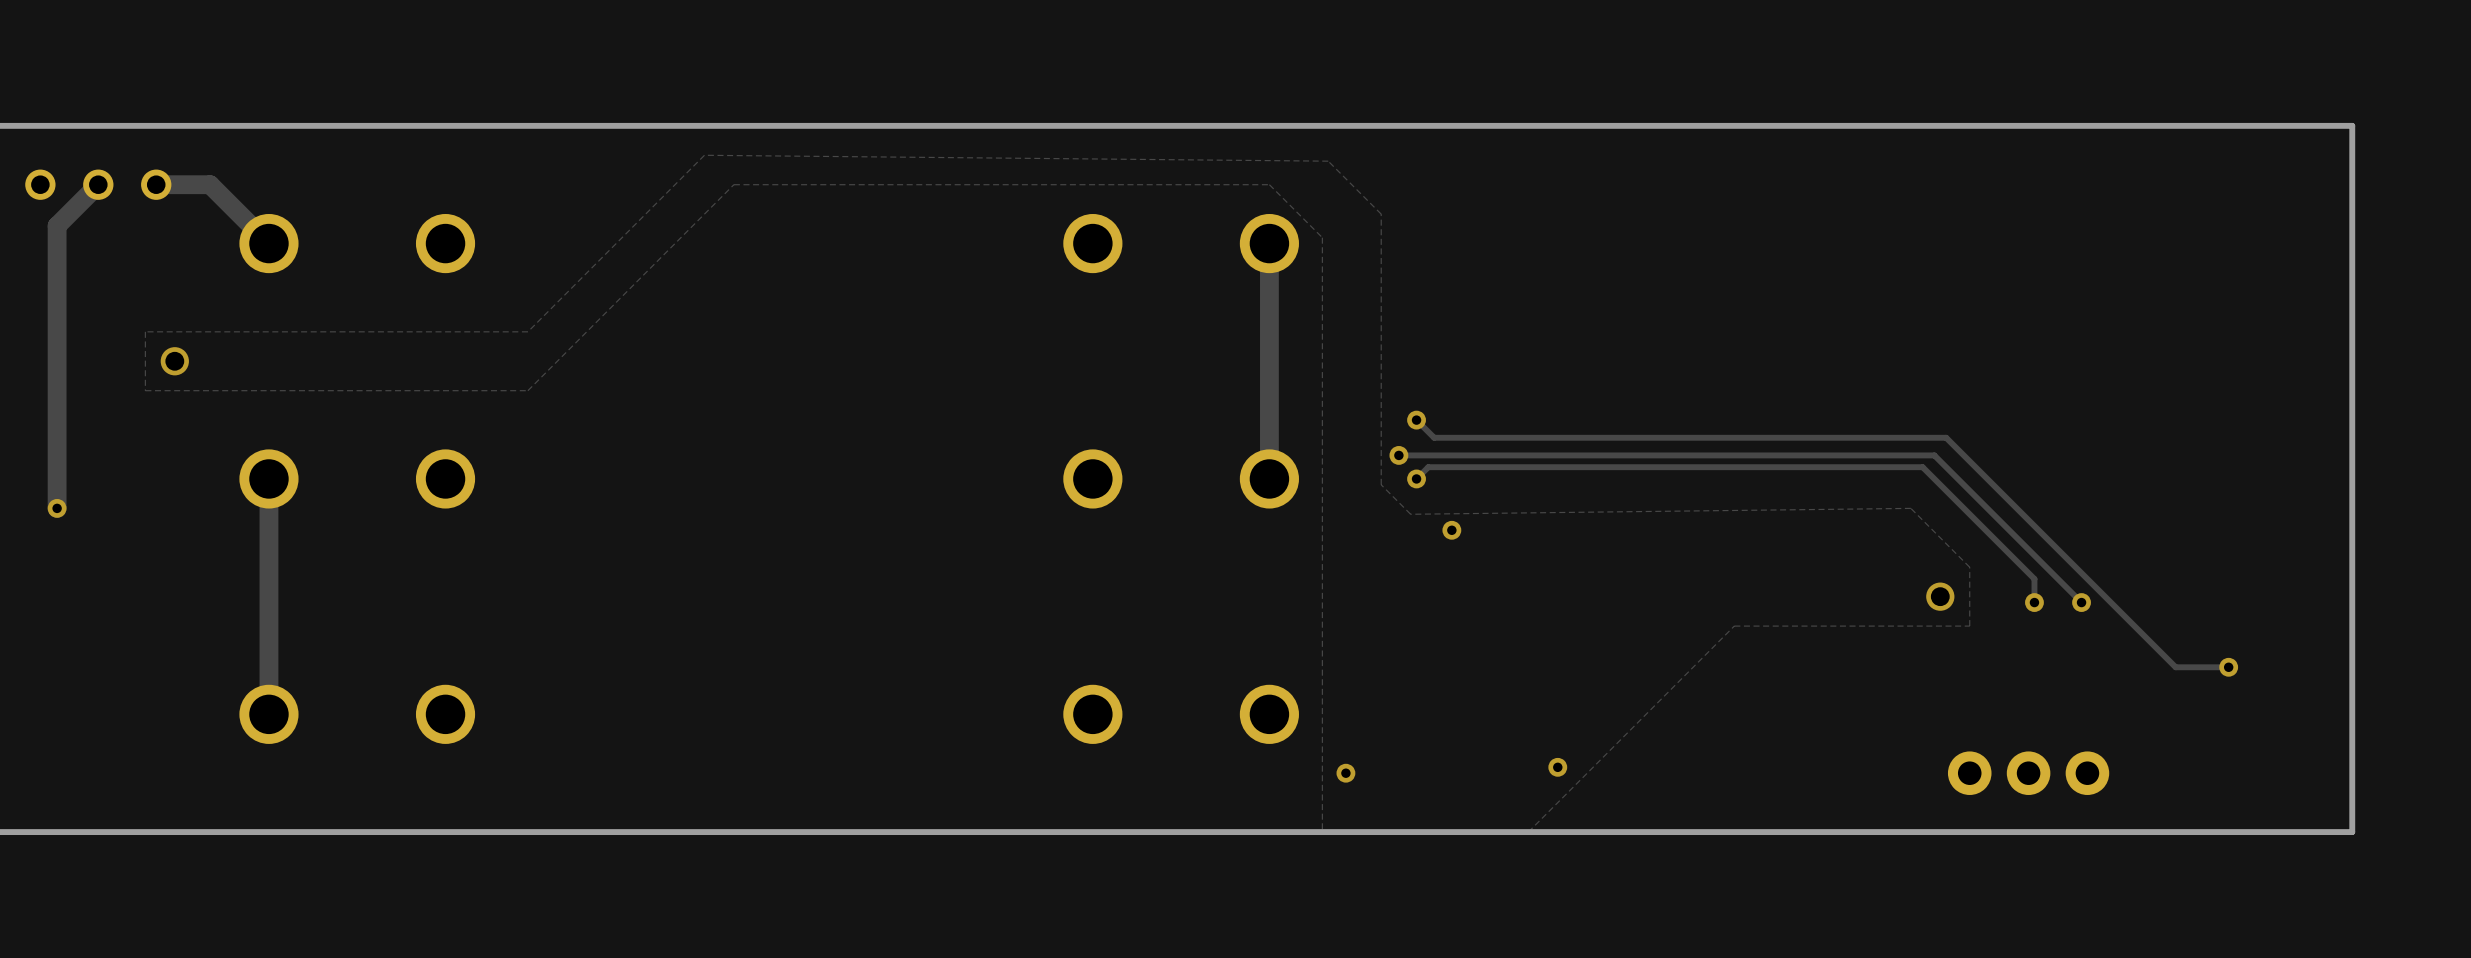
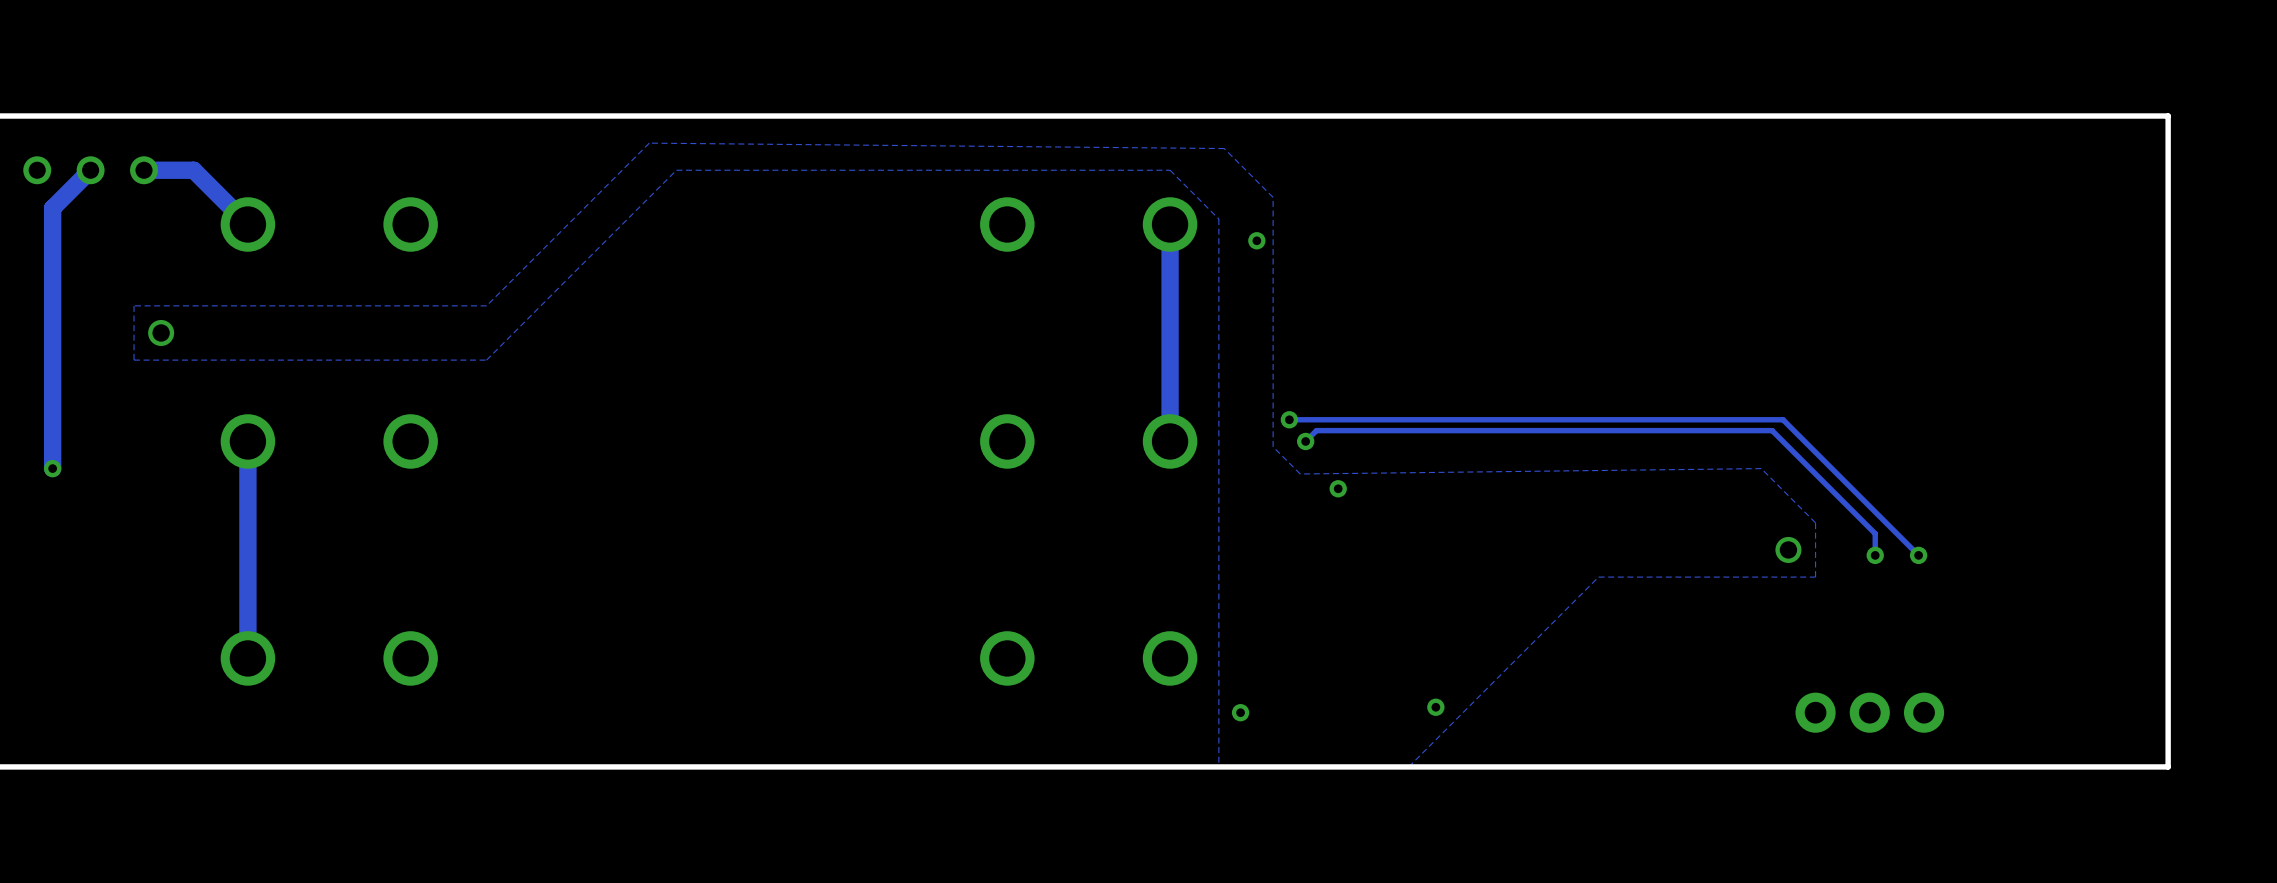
via: none -> (1256, 240)
track: (1416, 420) (1434, 437) (1946, 437) (2175, 667) (2228, 667) -> none
via: (1416, 420) -> none
via: (2228, 667) -> none

